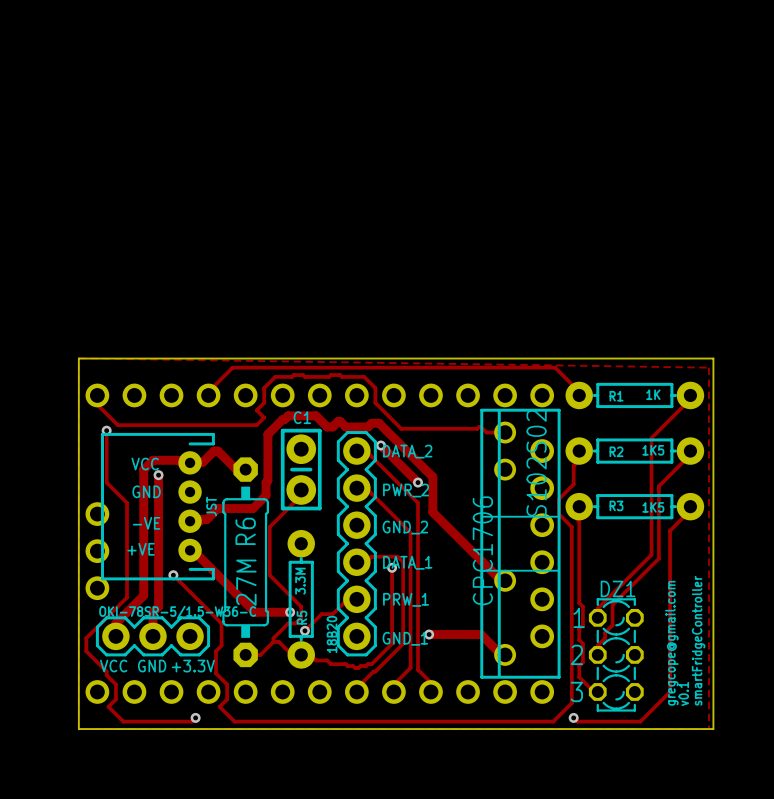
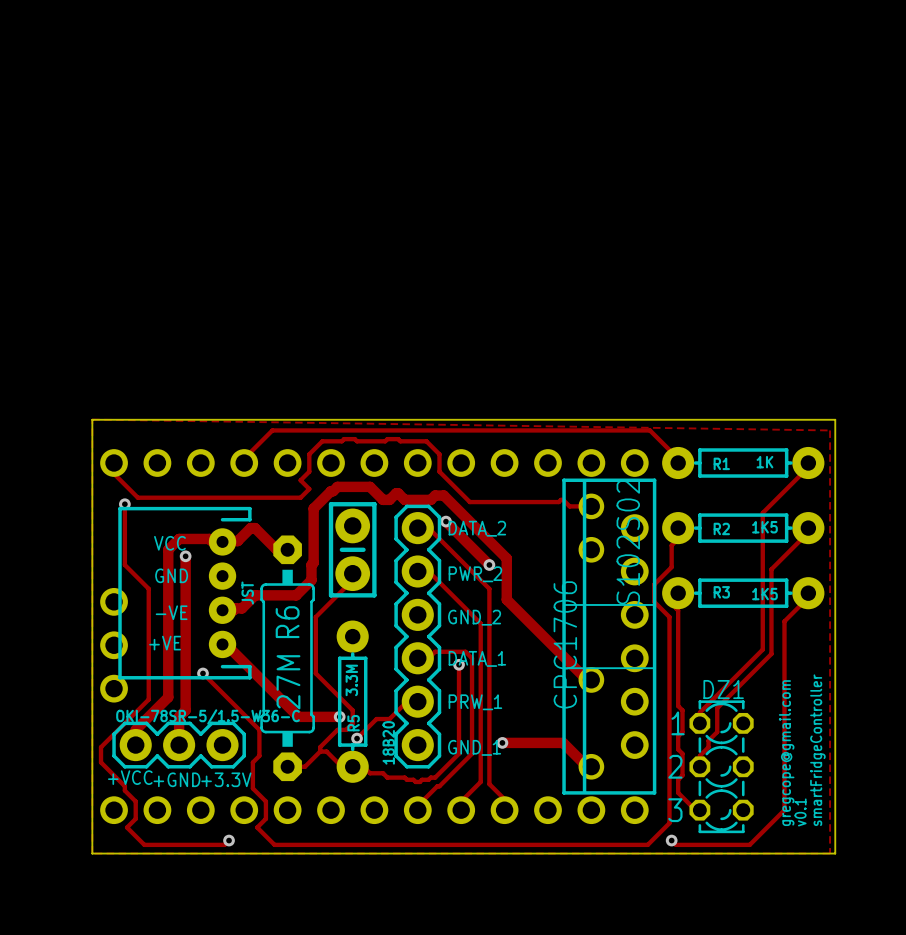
text: C1 (302, 417) -> none
text: VCC (113, 666) -> +VCC (130, 777)
text: GND (152, 666) -> +GND (176, 779)

